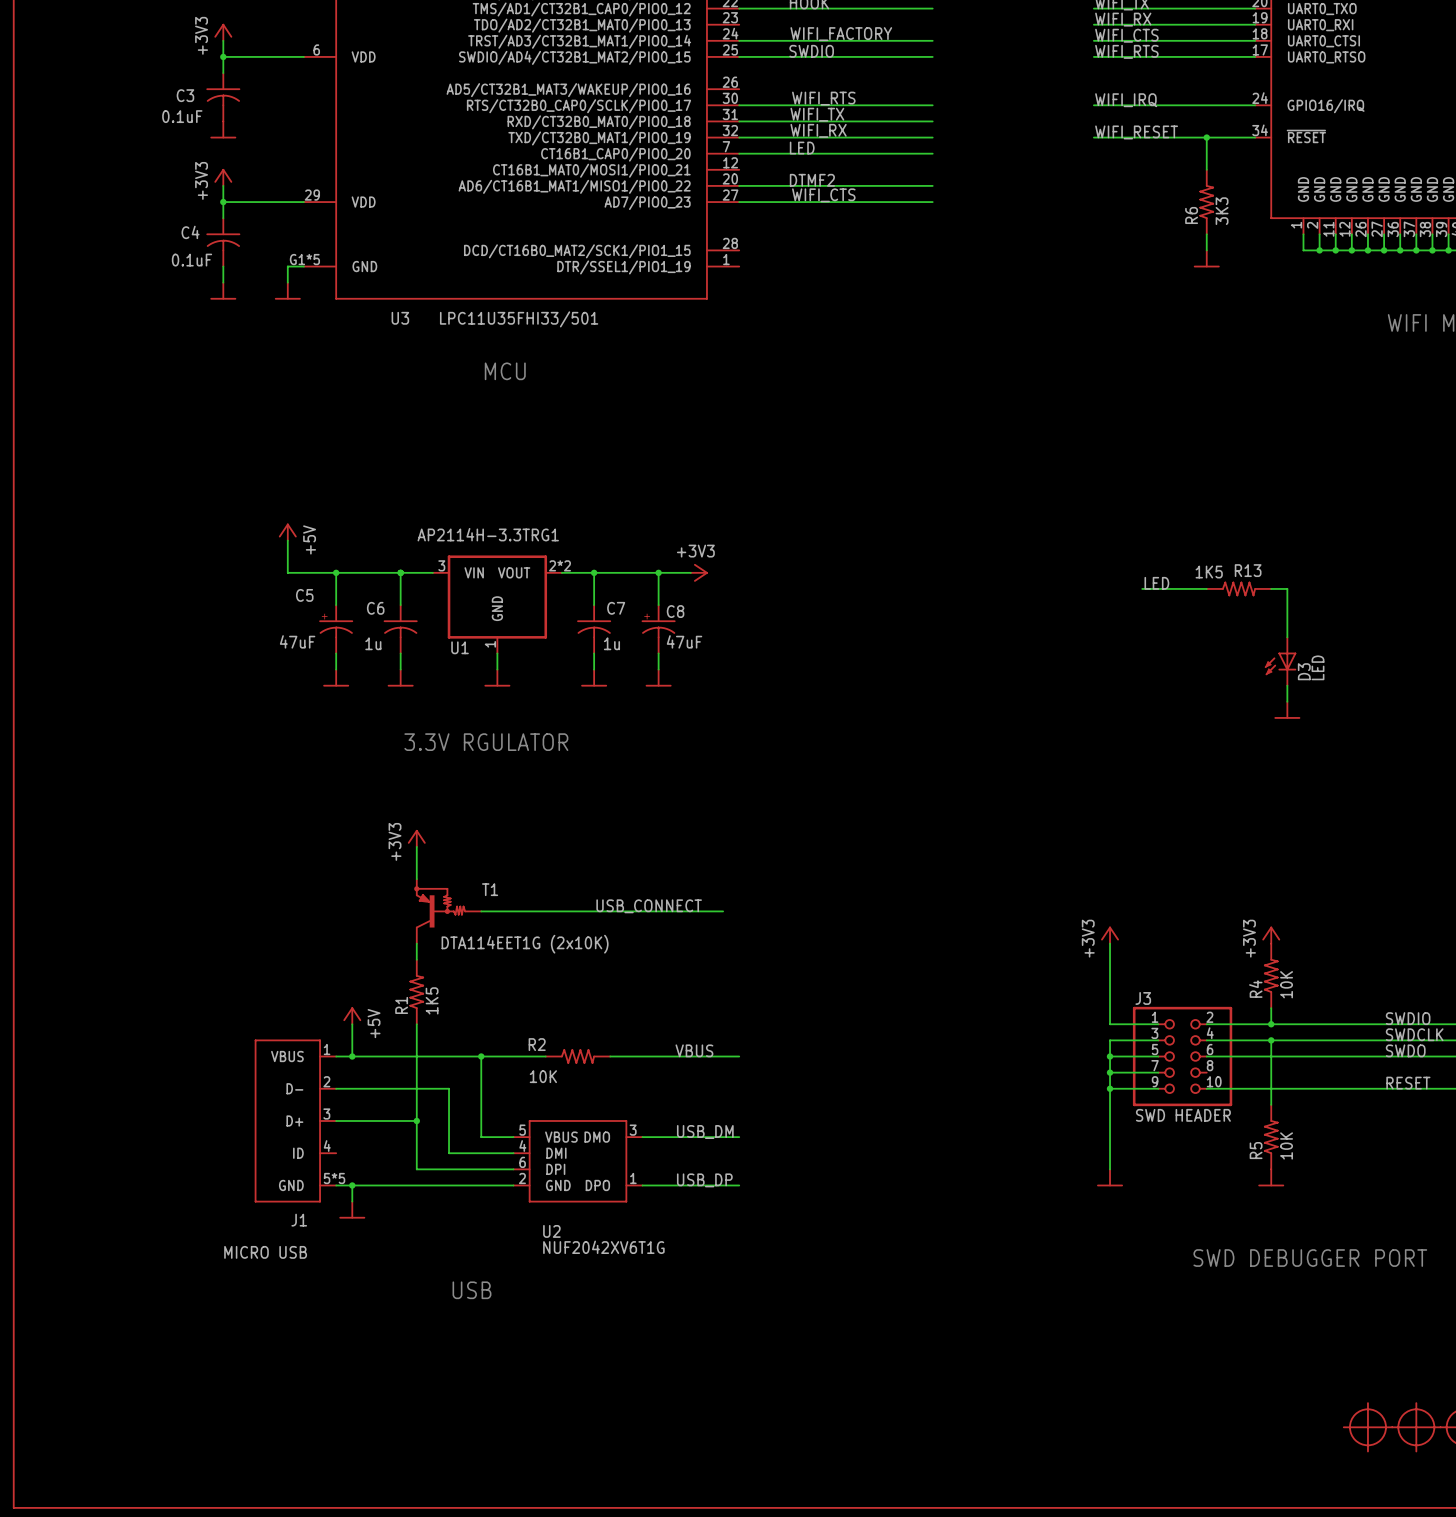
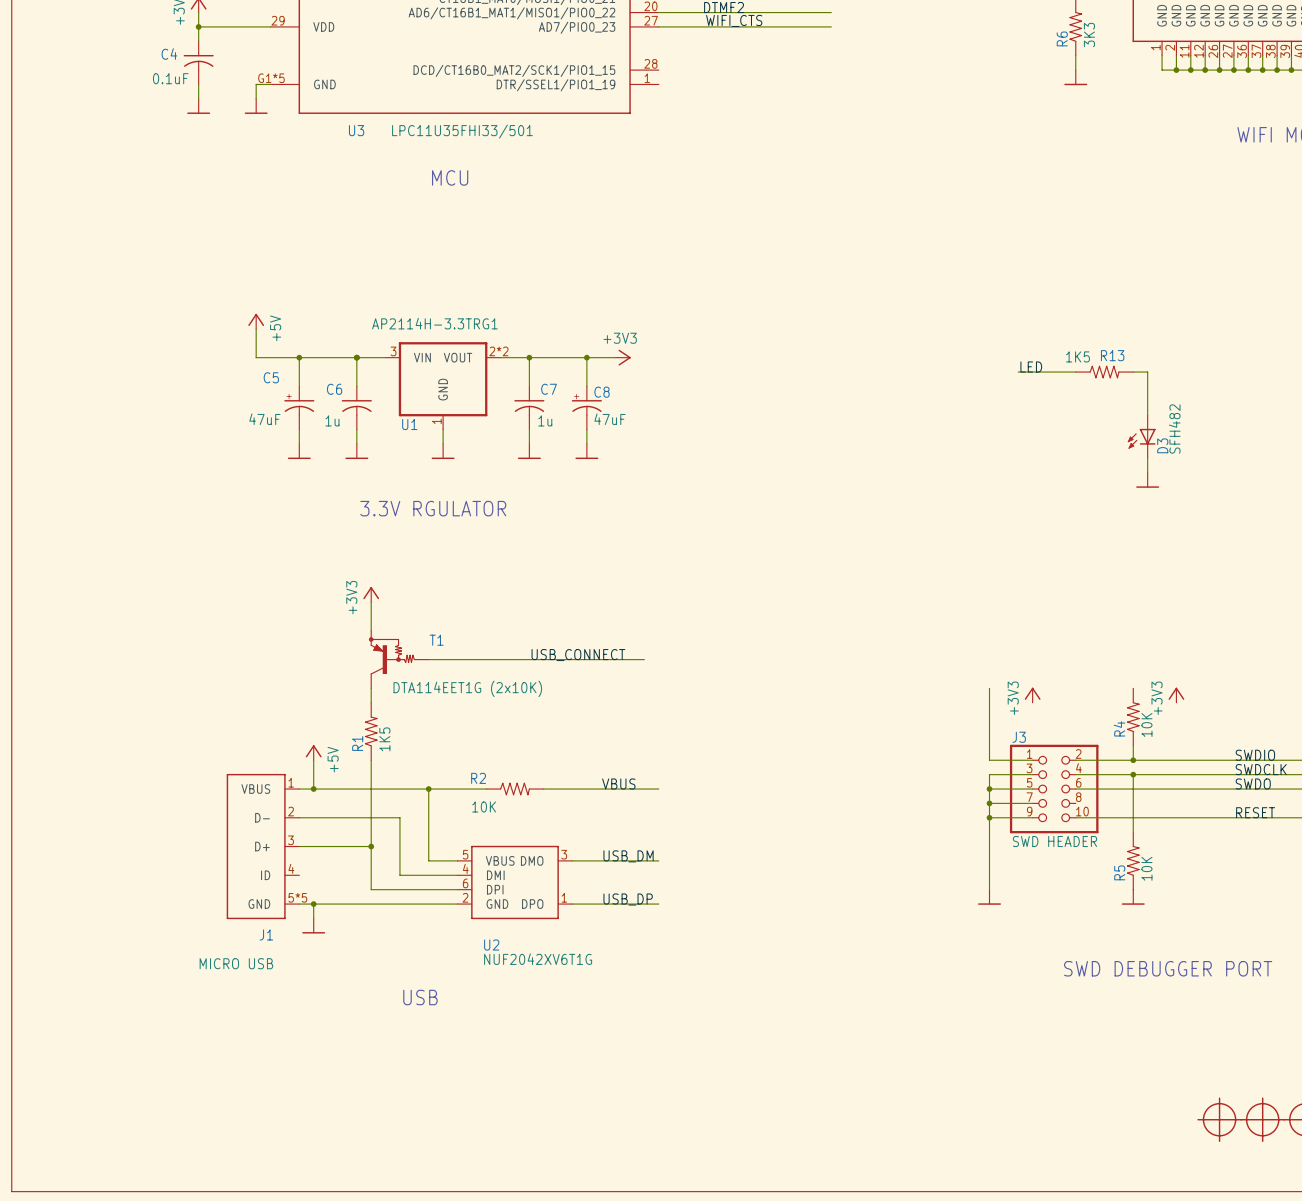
D3 value: LED (1317, 667) -> SFH482 (1174, 429)
power symbol position: +3V3 (1110, 935) -> +3V3 (1032, 695)
power symbol position: +3V3 (1271, 935) -> +3V3 (1176, 695)

